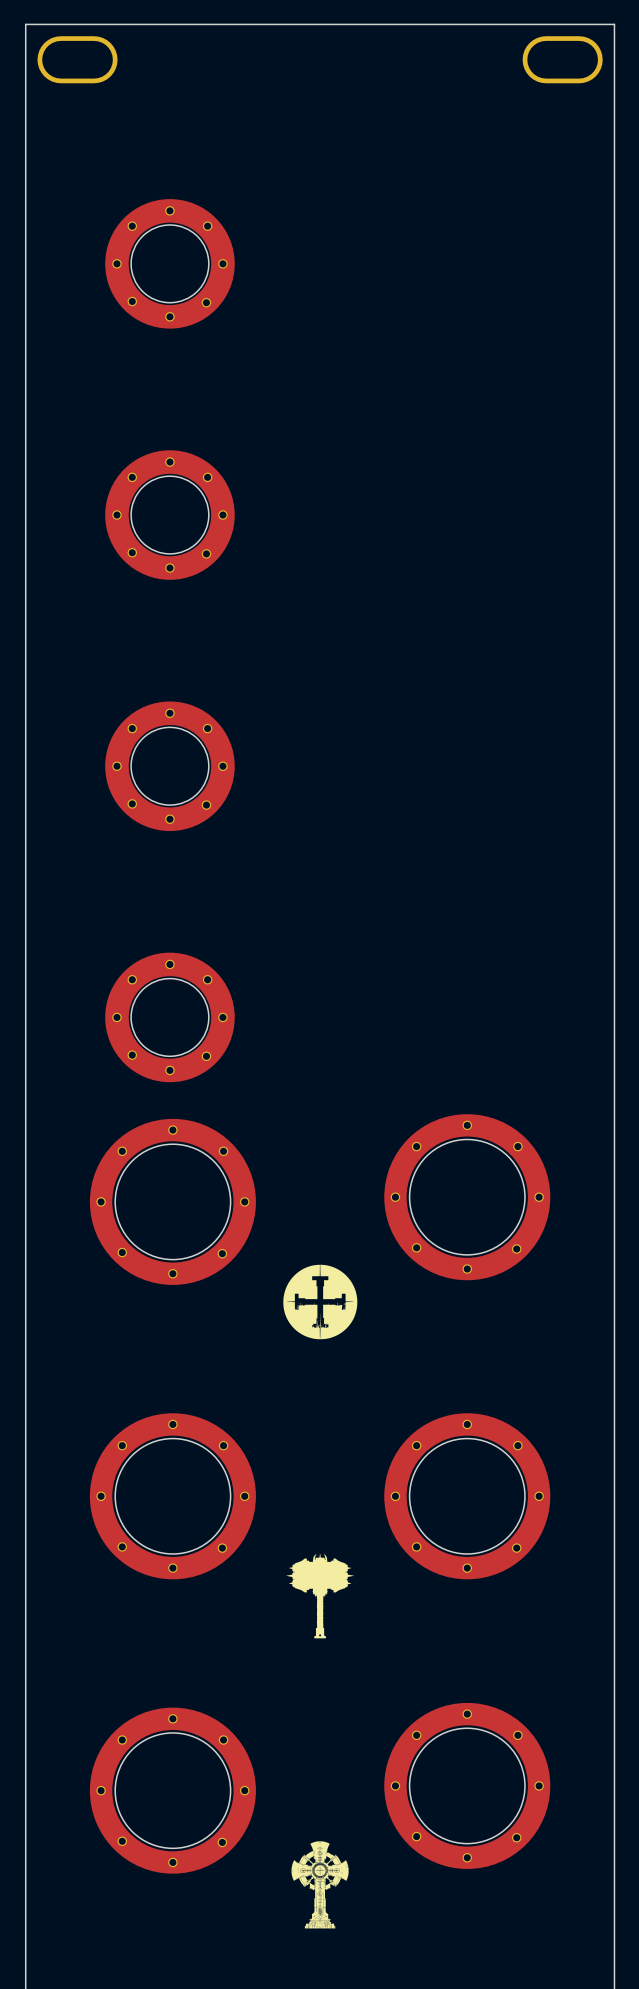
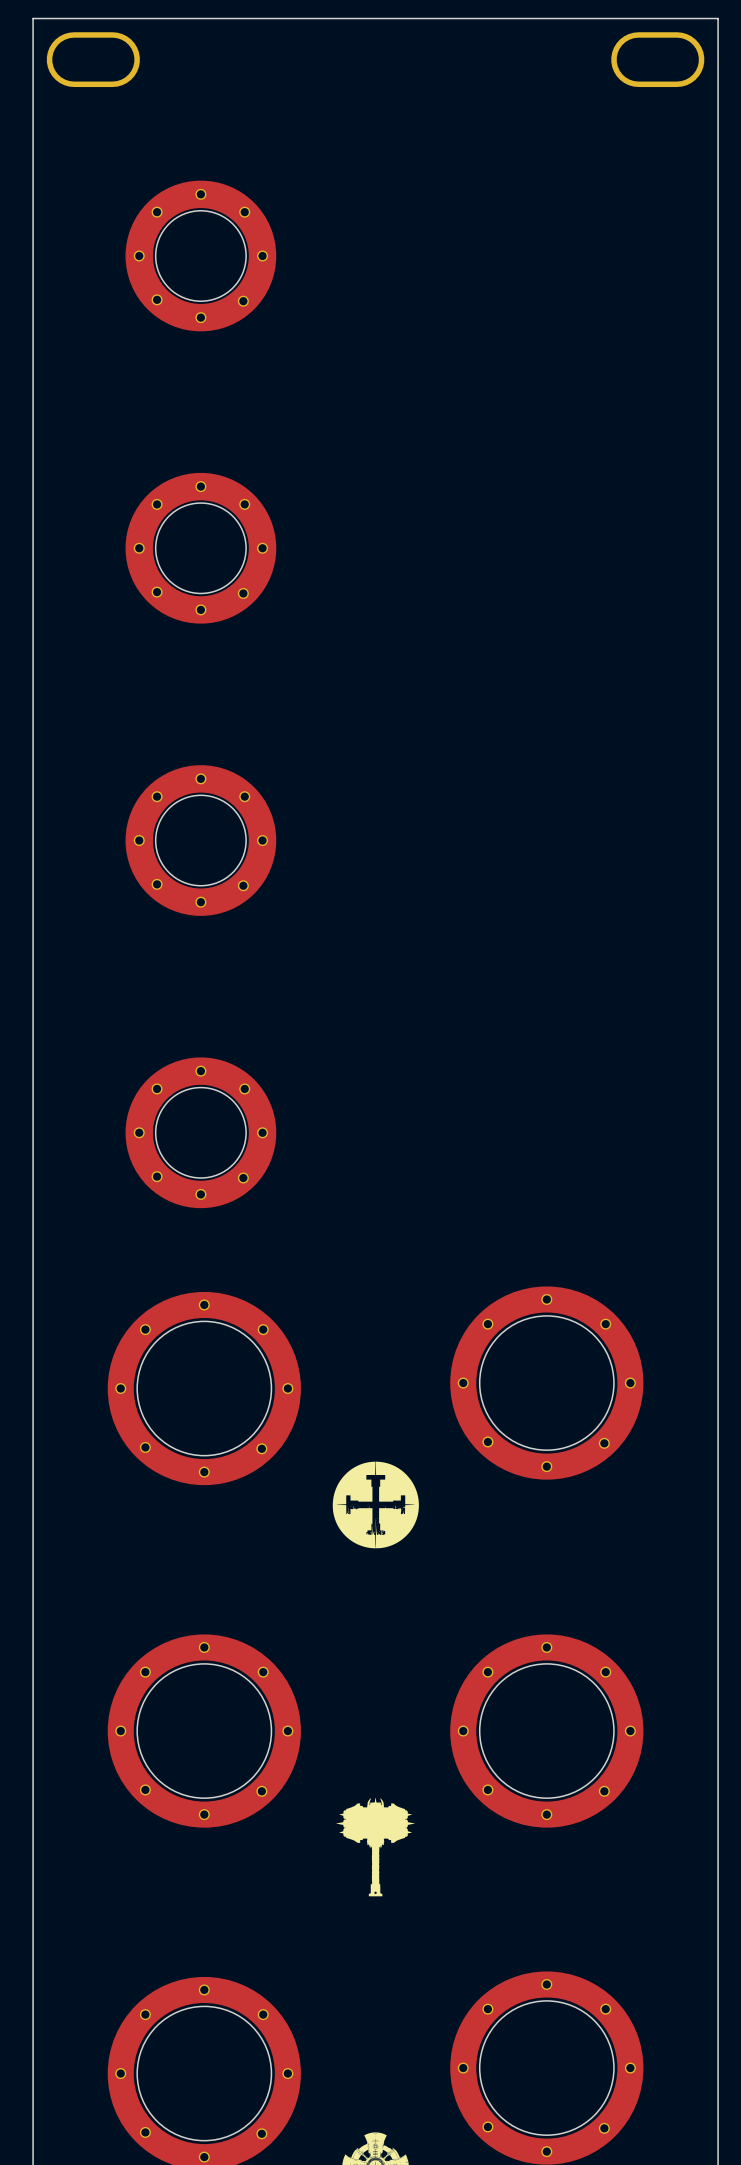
part position: (169, 263) -> (200, 255)
part position: (169, 515) -> (200, 548)
part position: (169, 766) -> (200, 840)
part position: (169, 1017) -> (200, 1132)

